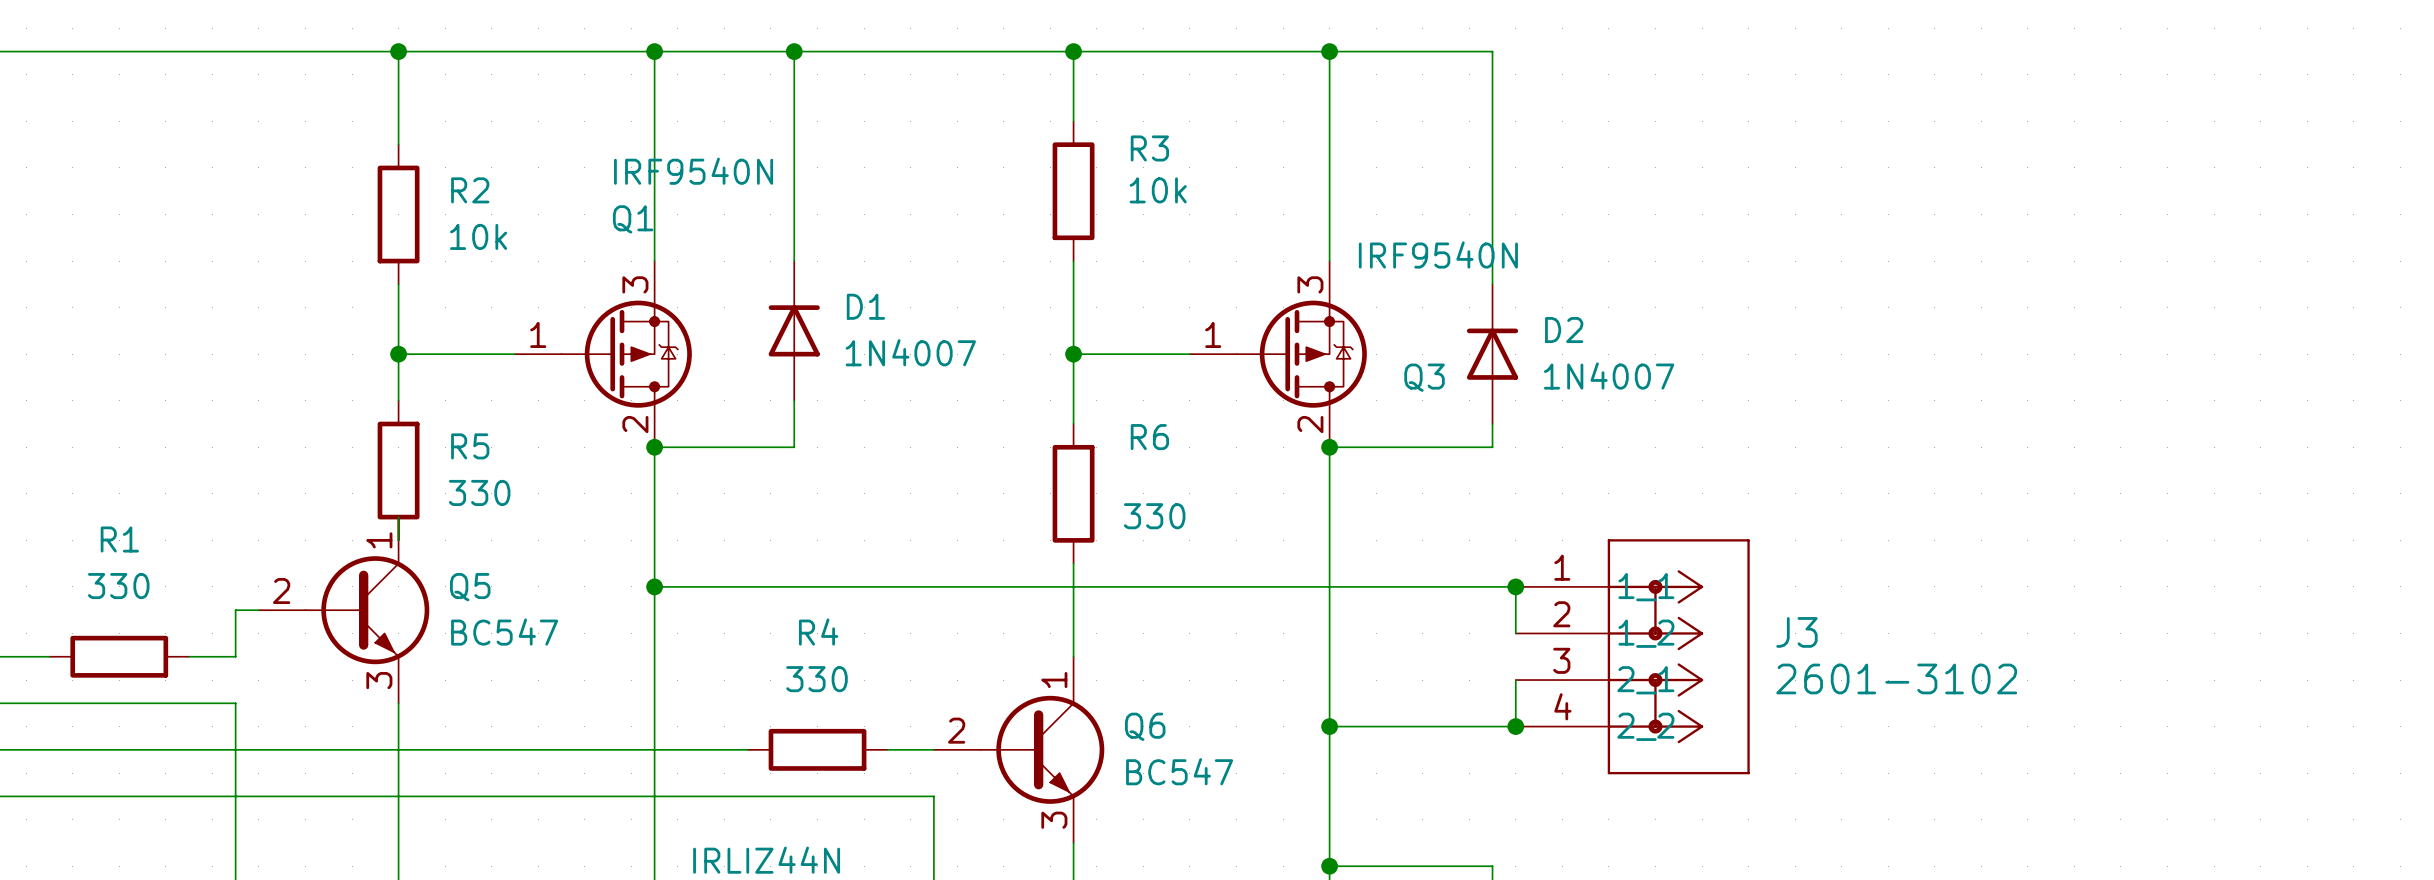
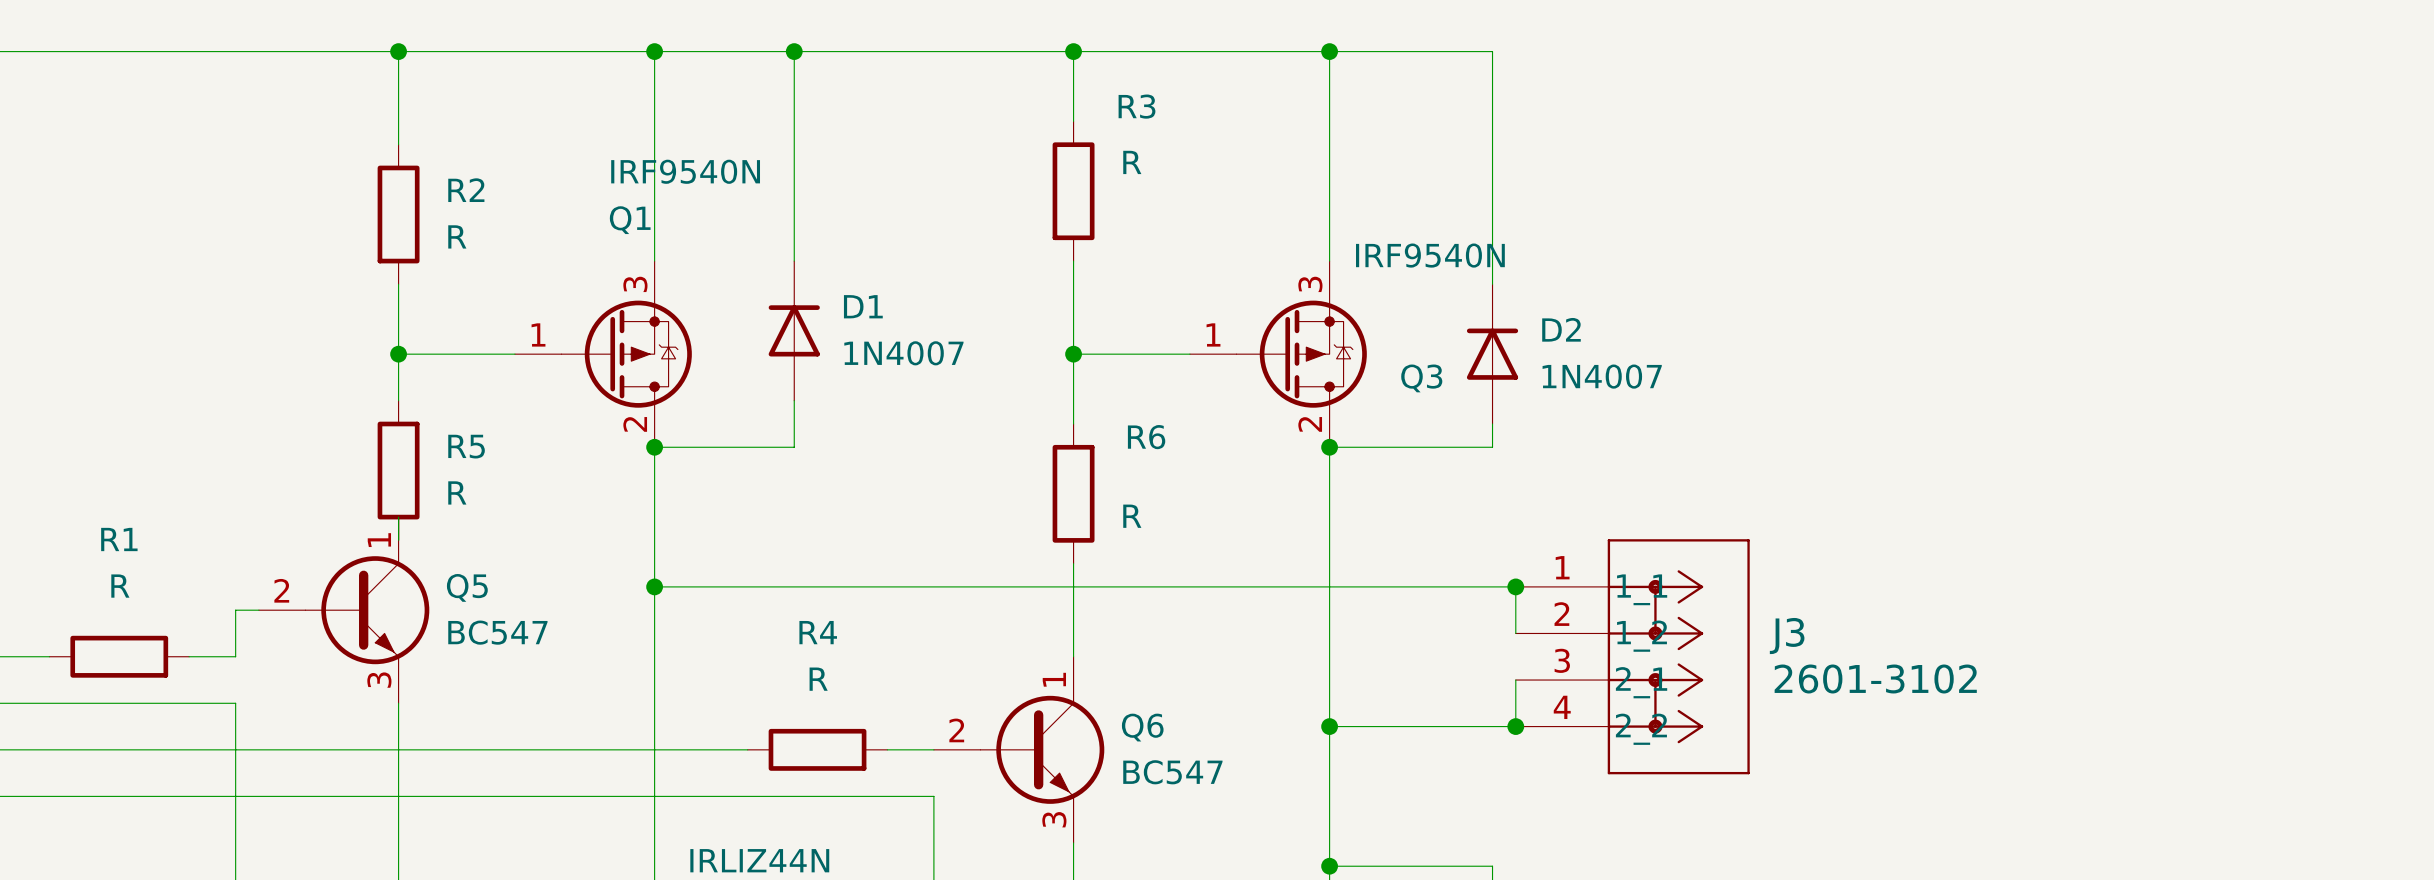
R3 name position: R3 (1149, 148) -> R3 (1136, 106)
R3 value: 10k (1158, 190) -> R (1132, 162)
R2 value: 10k (478, 236) -> R (457, 236)
R5 value: 330 (479, 492) -> R (457, 492)
R6 value: 330 (1154, 516) -> R (1132, 516)
R1 value: 330 (118, 586) -> R (120, 586)
R4 value: 330 (816, 679) -> R (818, 679)

